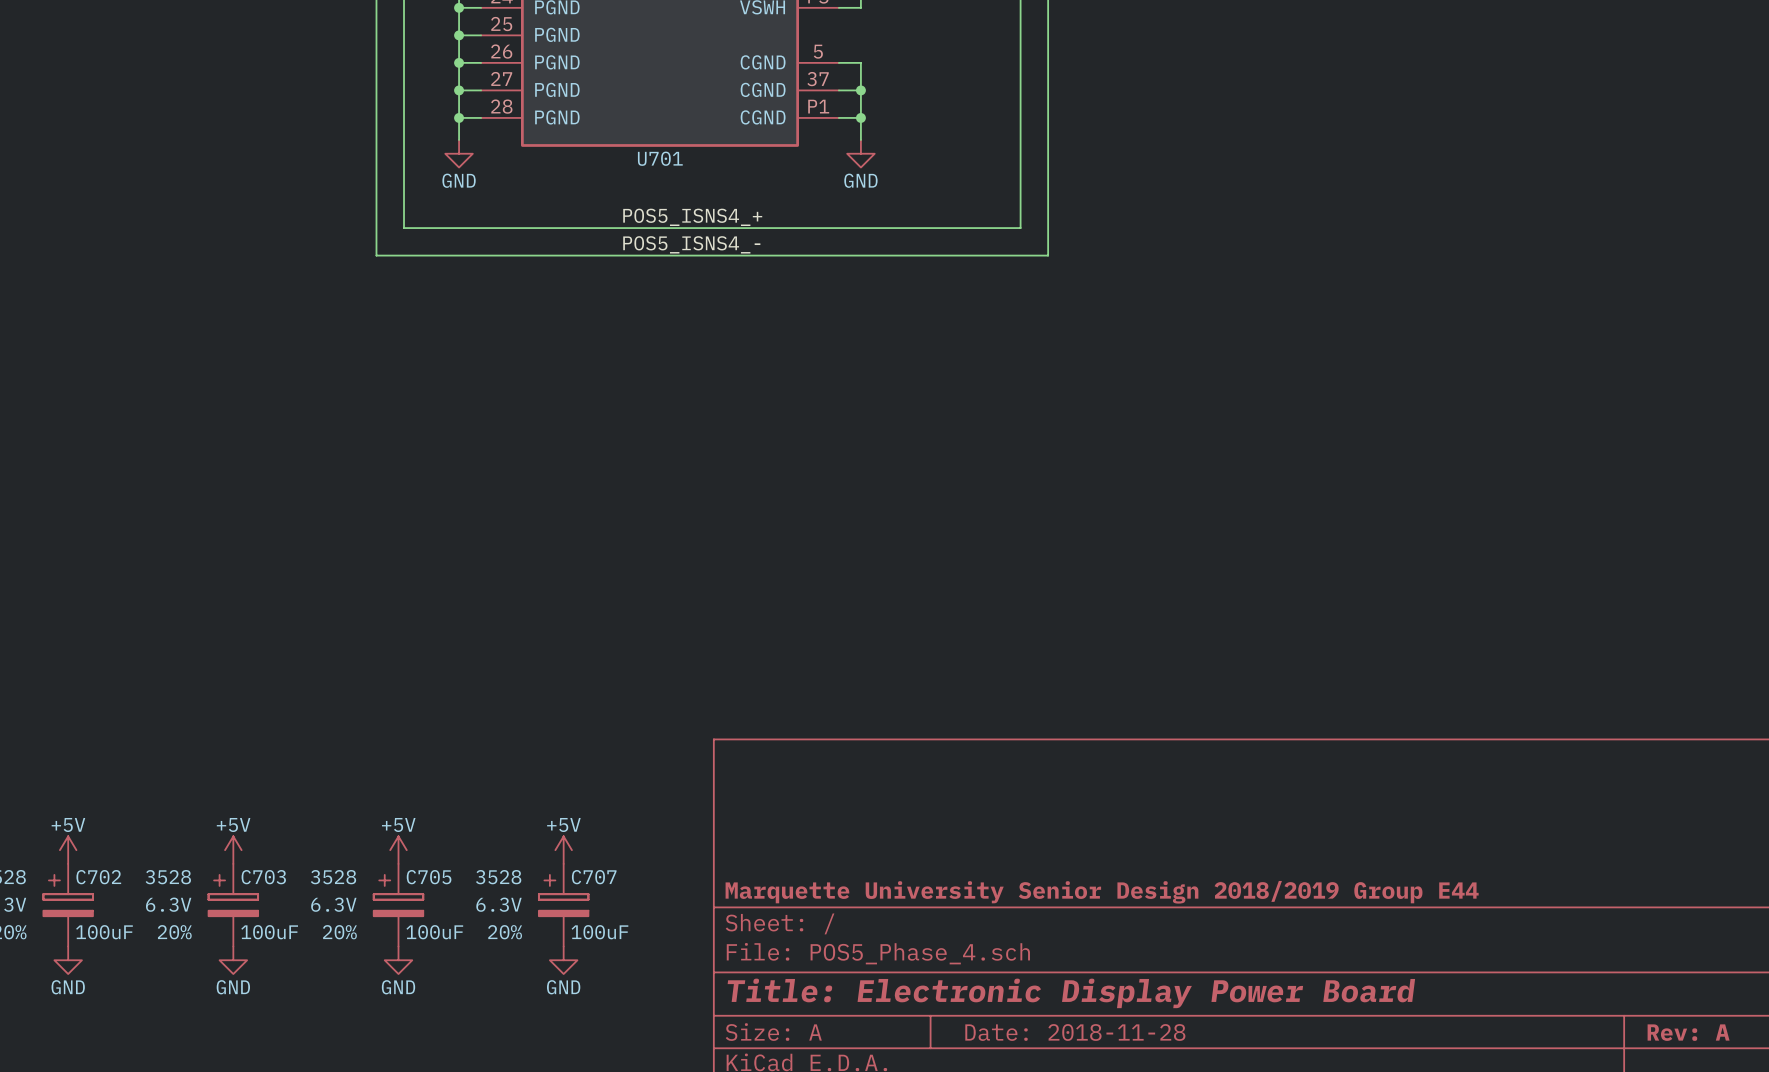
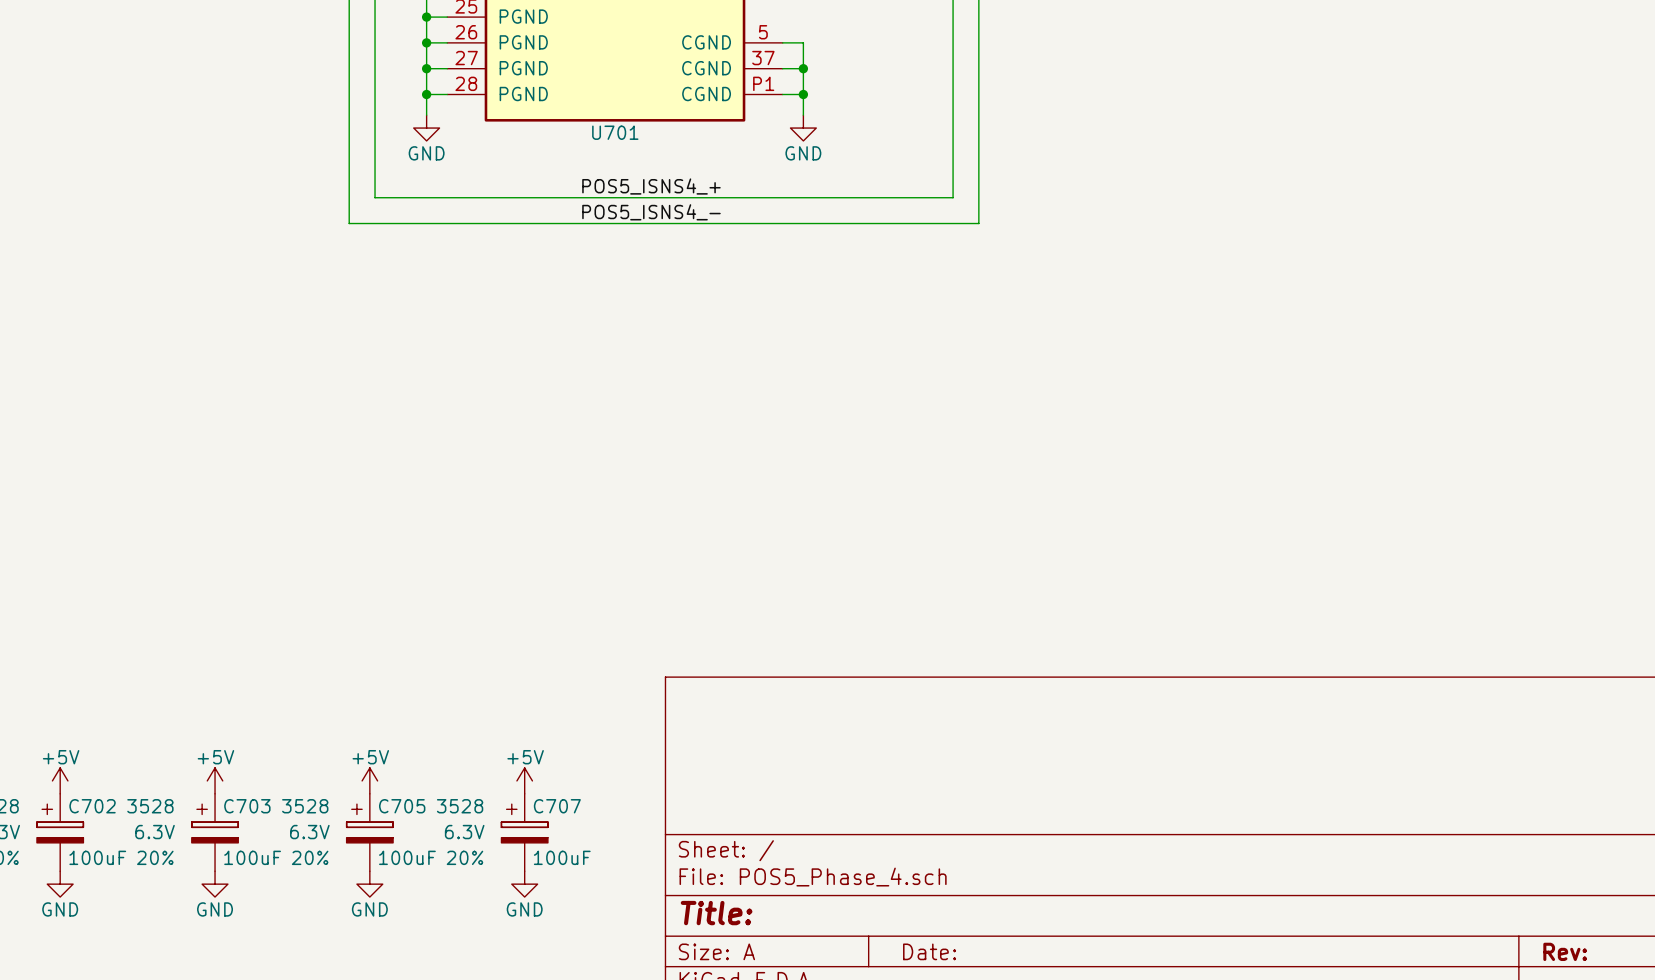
title block: Marquette University Senior Design 2018/2019 Group E44 (1102, 892) -> none
title block: Title: Electronic Display Power Board (1071, 993) -> Title: (716, 913)
title block: Date: 2018-11-28 (1075, 1032) -> Date: (929, 951)
title block: Rev: A (1688, 1032) -> Rev: (1565, 951)

